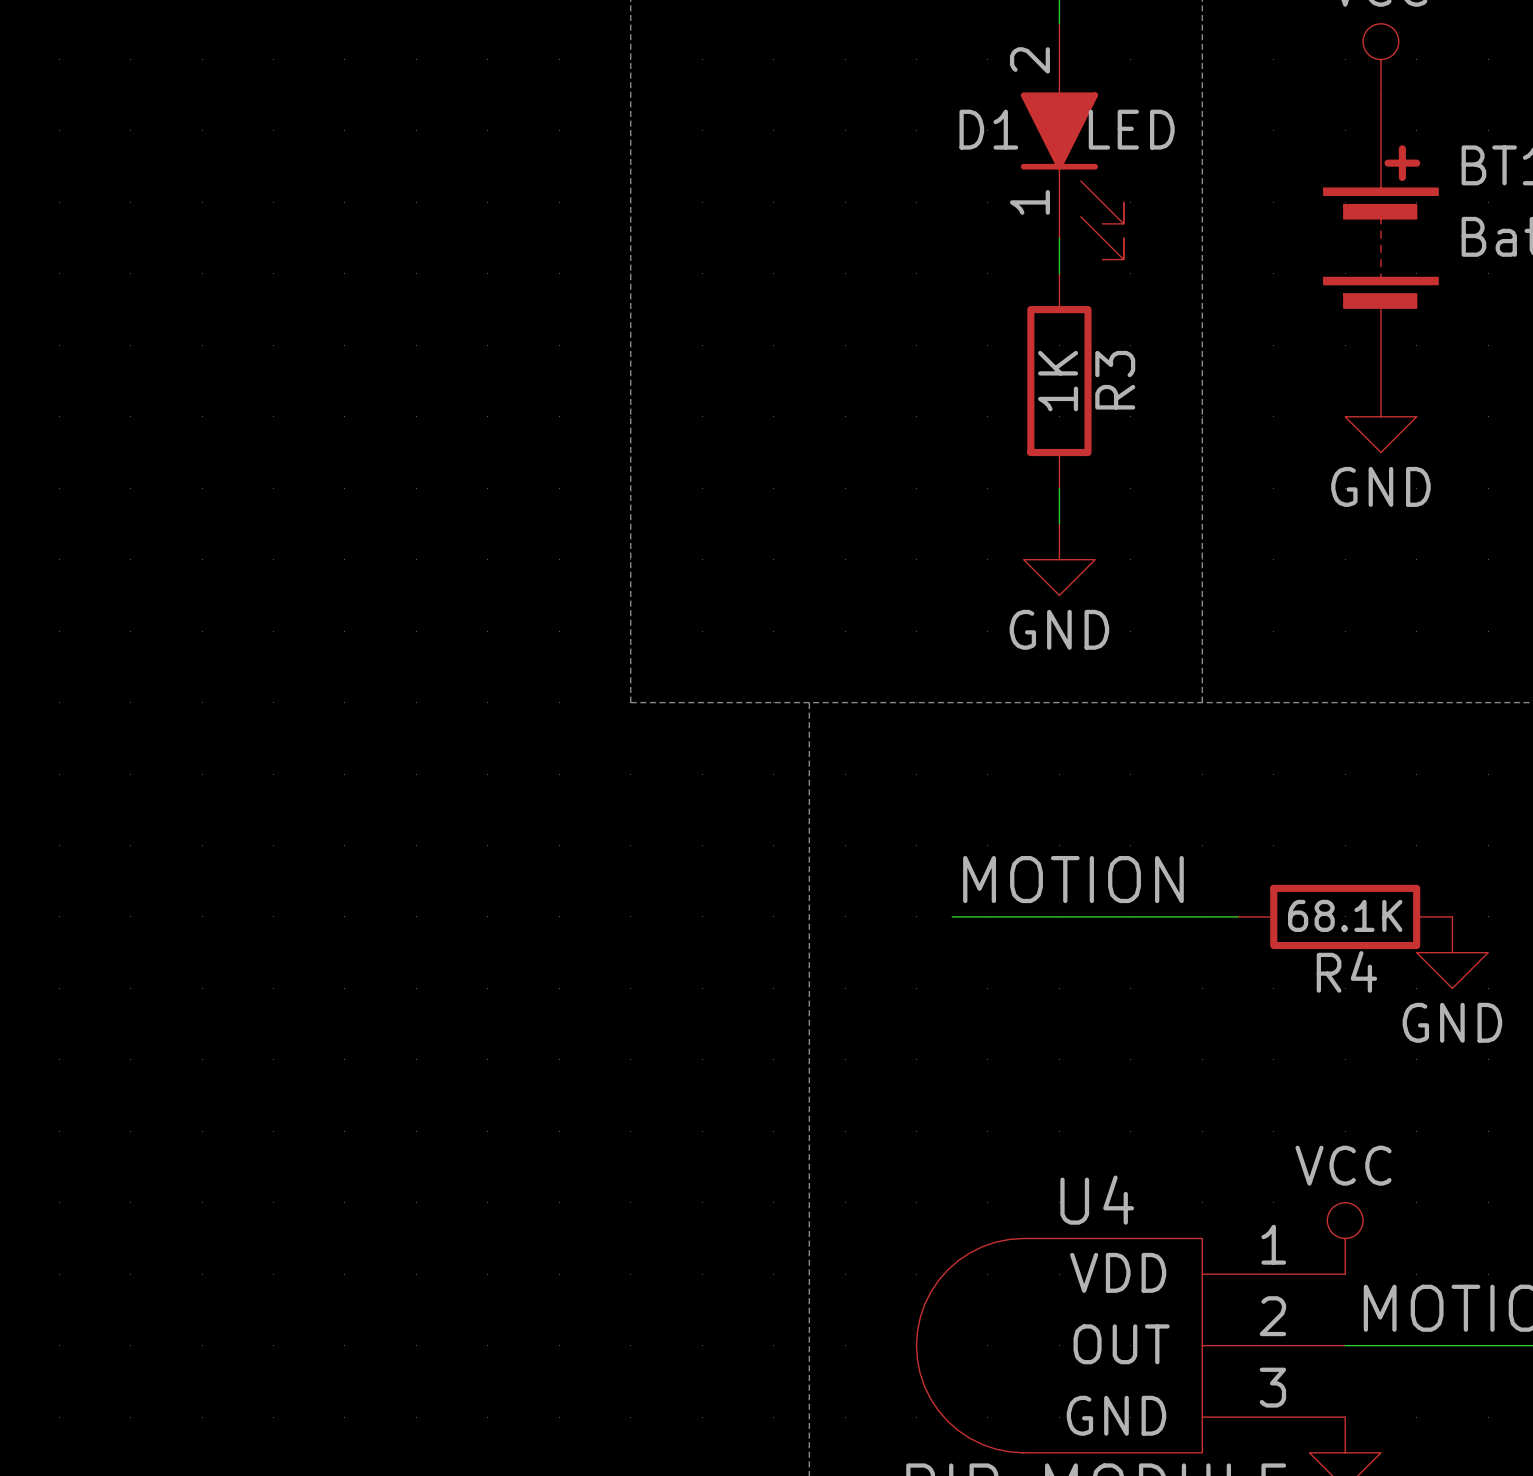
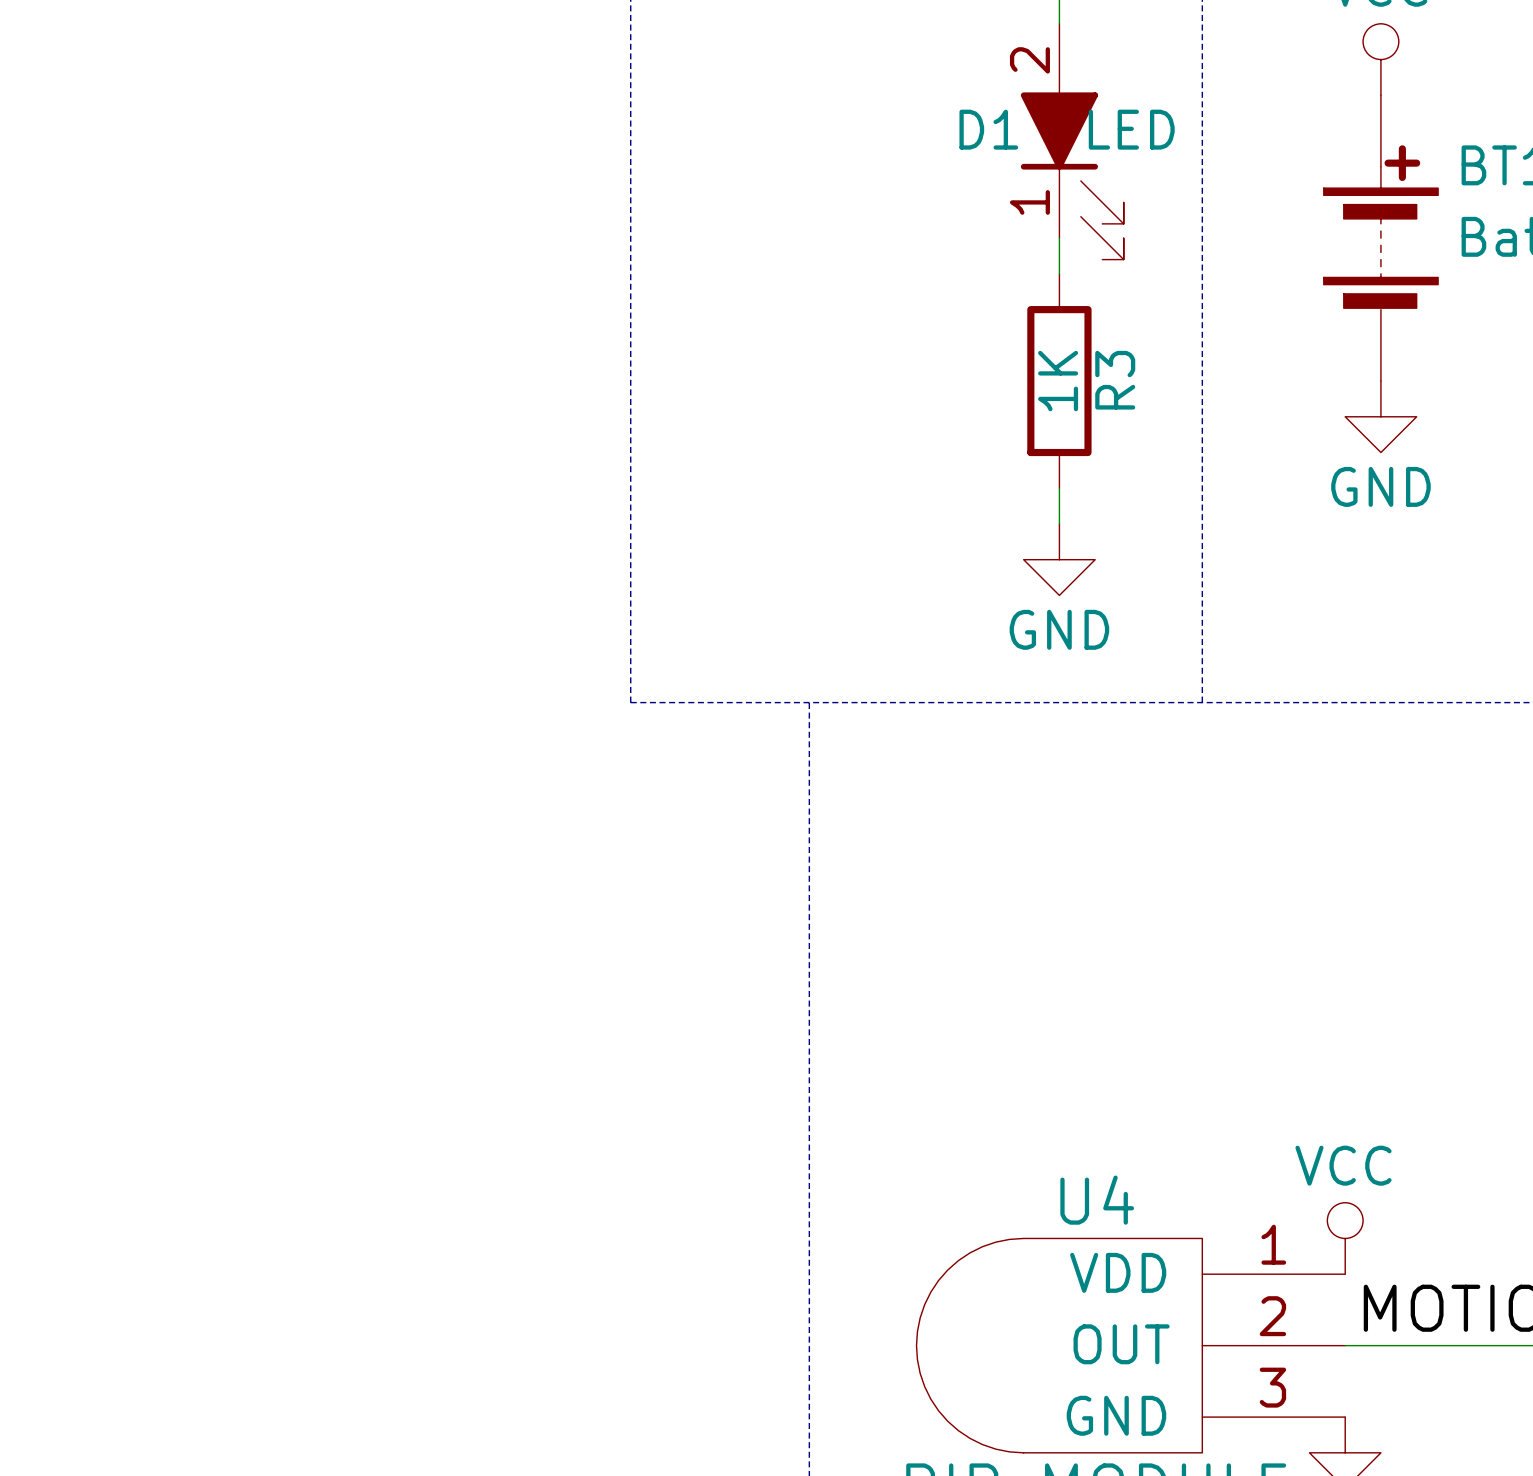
label: MOTION (1073, 879) -> none
wire: (952, 916) (1238, 916) -> none
R4: 68.1K (1345, 916) -> none
power symbol: GND (1452, 952) -> none

